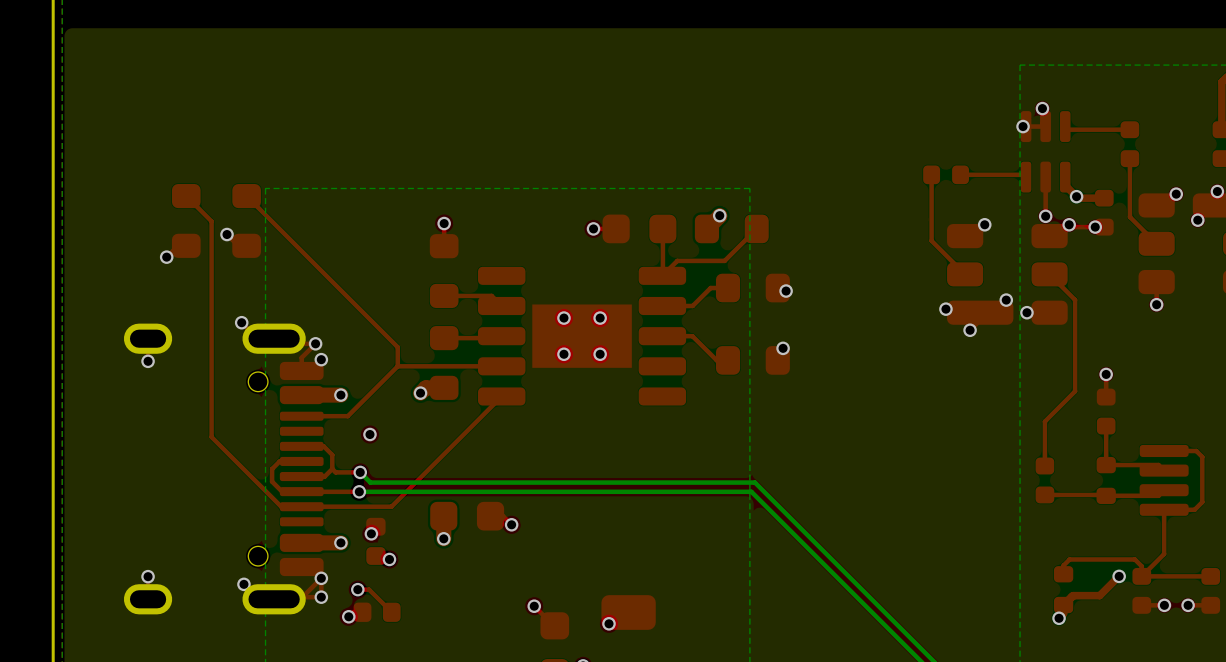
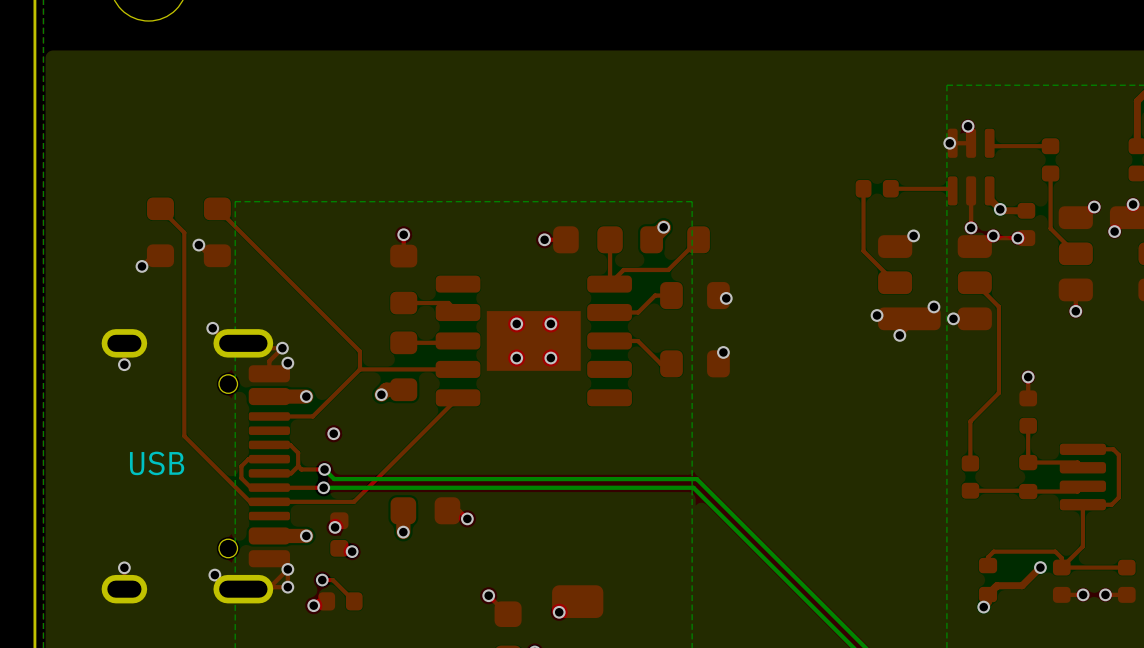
text: none -> USB (157, 463)

